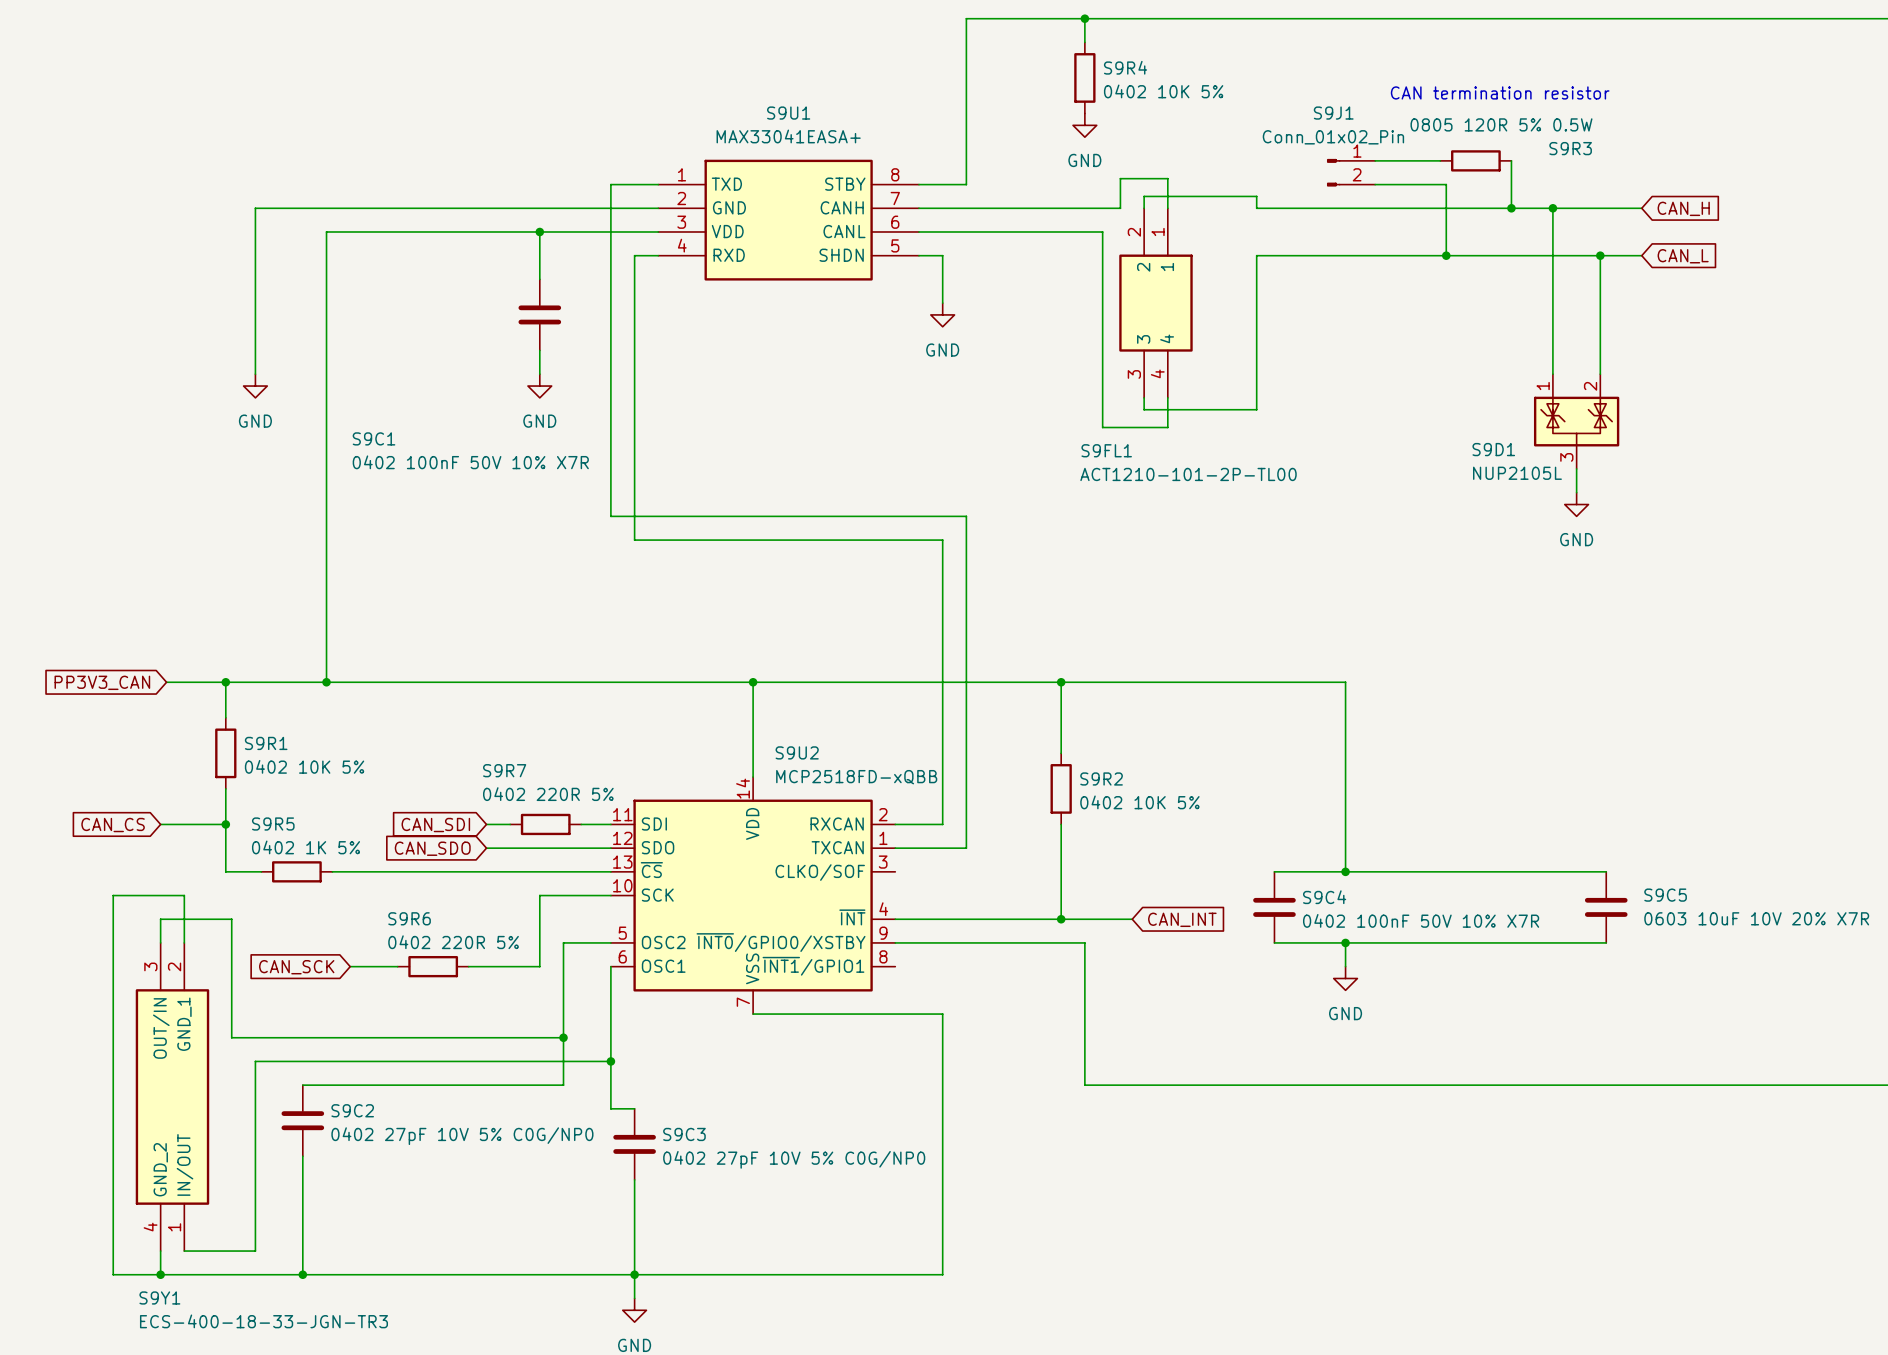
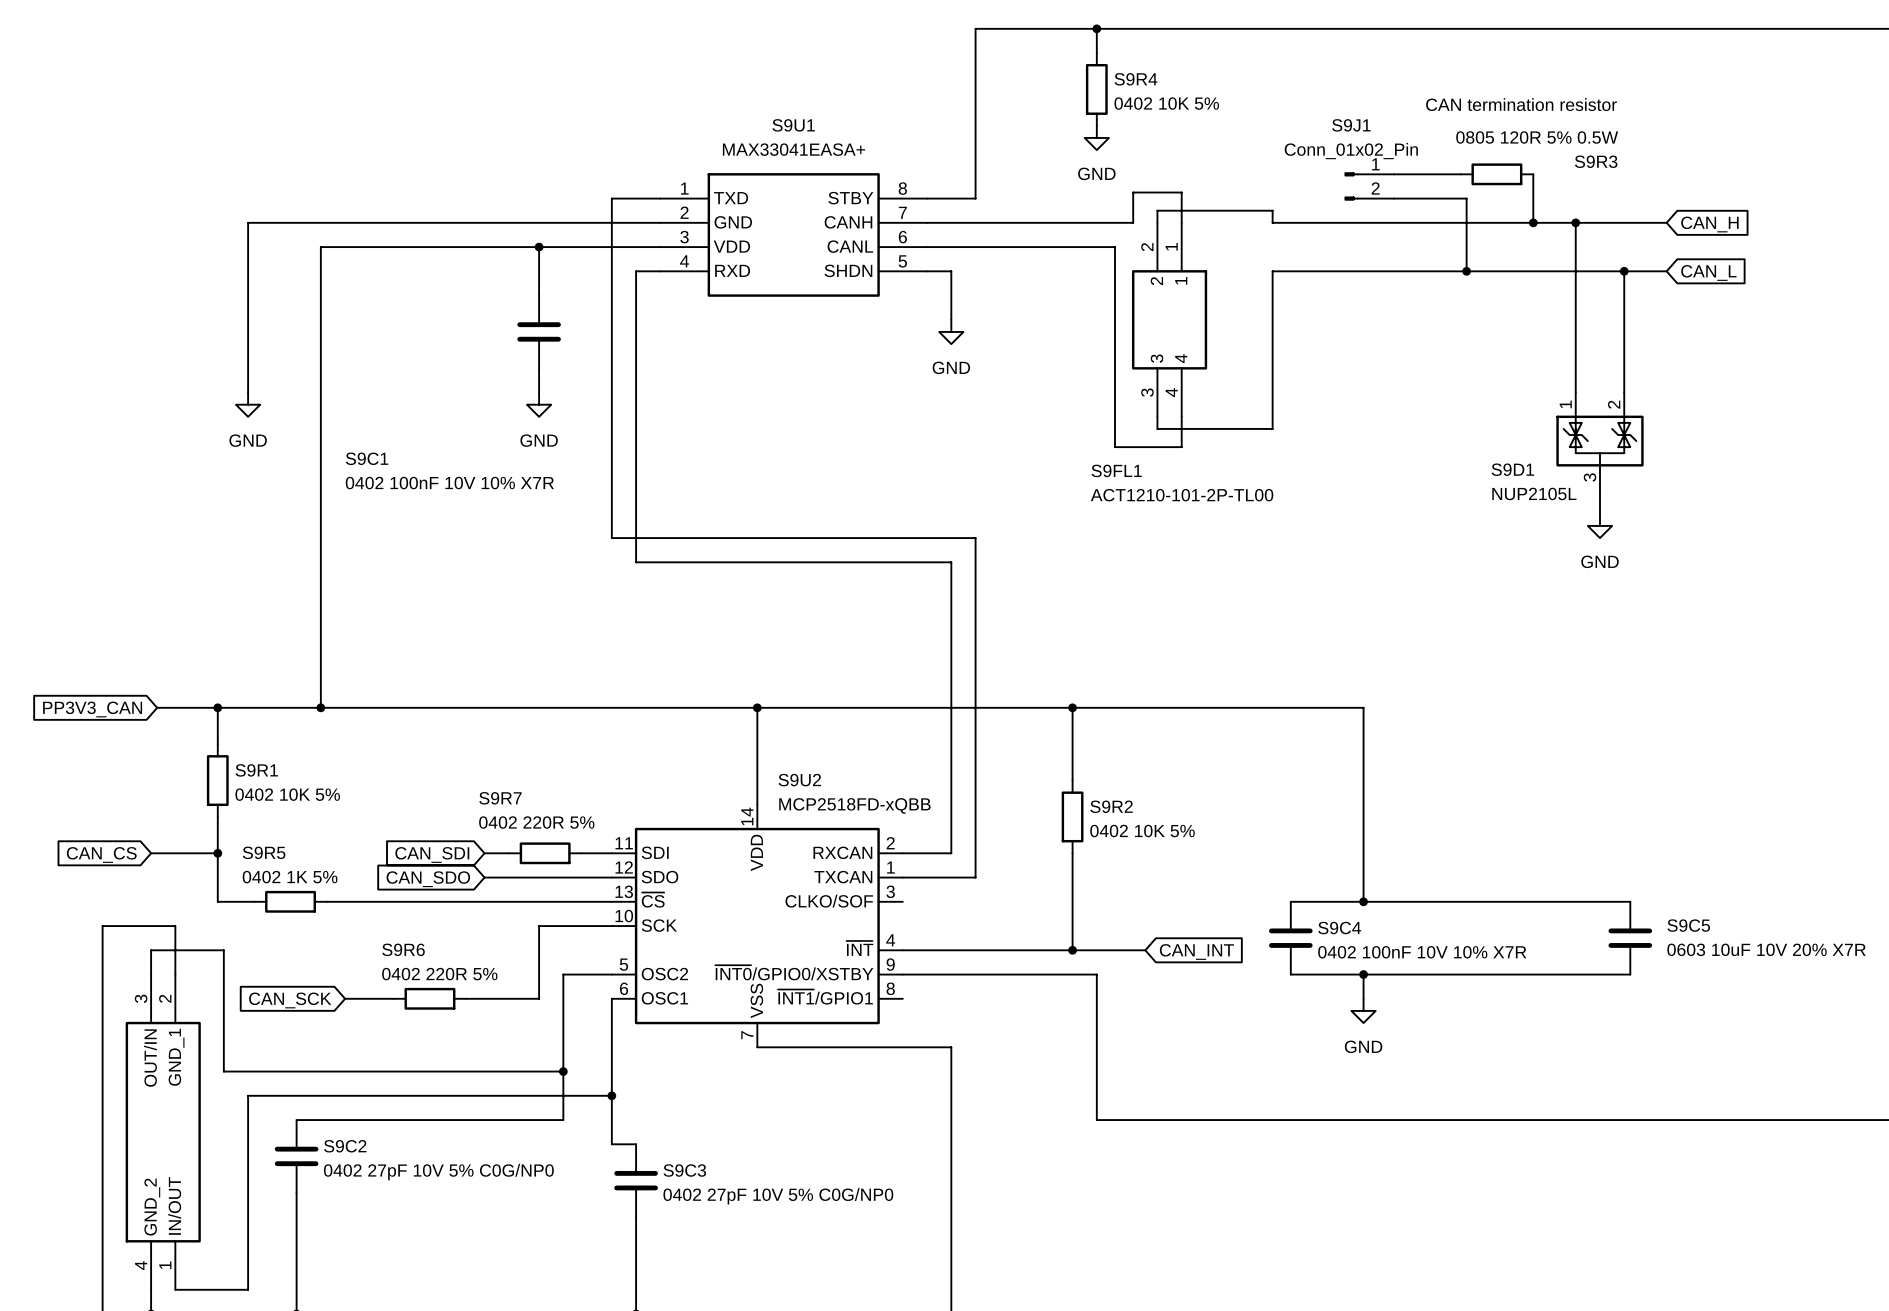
S9C1 value: 0402 100nF 50V 10% X7R (470, 462) -> 0402 100nF 10V 10% X7R (449, 483)
S9C4 value: 0402 100nF 50V 10% X7R (1421, 920) -> 0402 100nF 10V 10% X7R (1422, 952)

